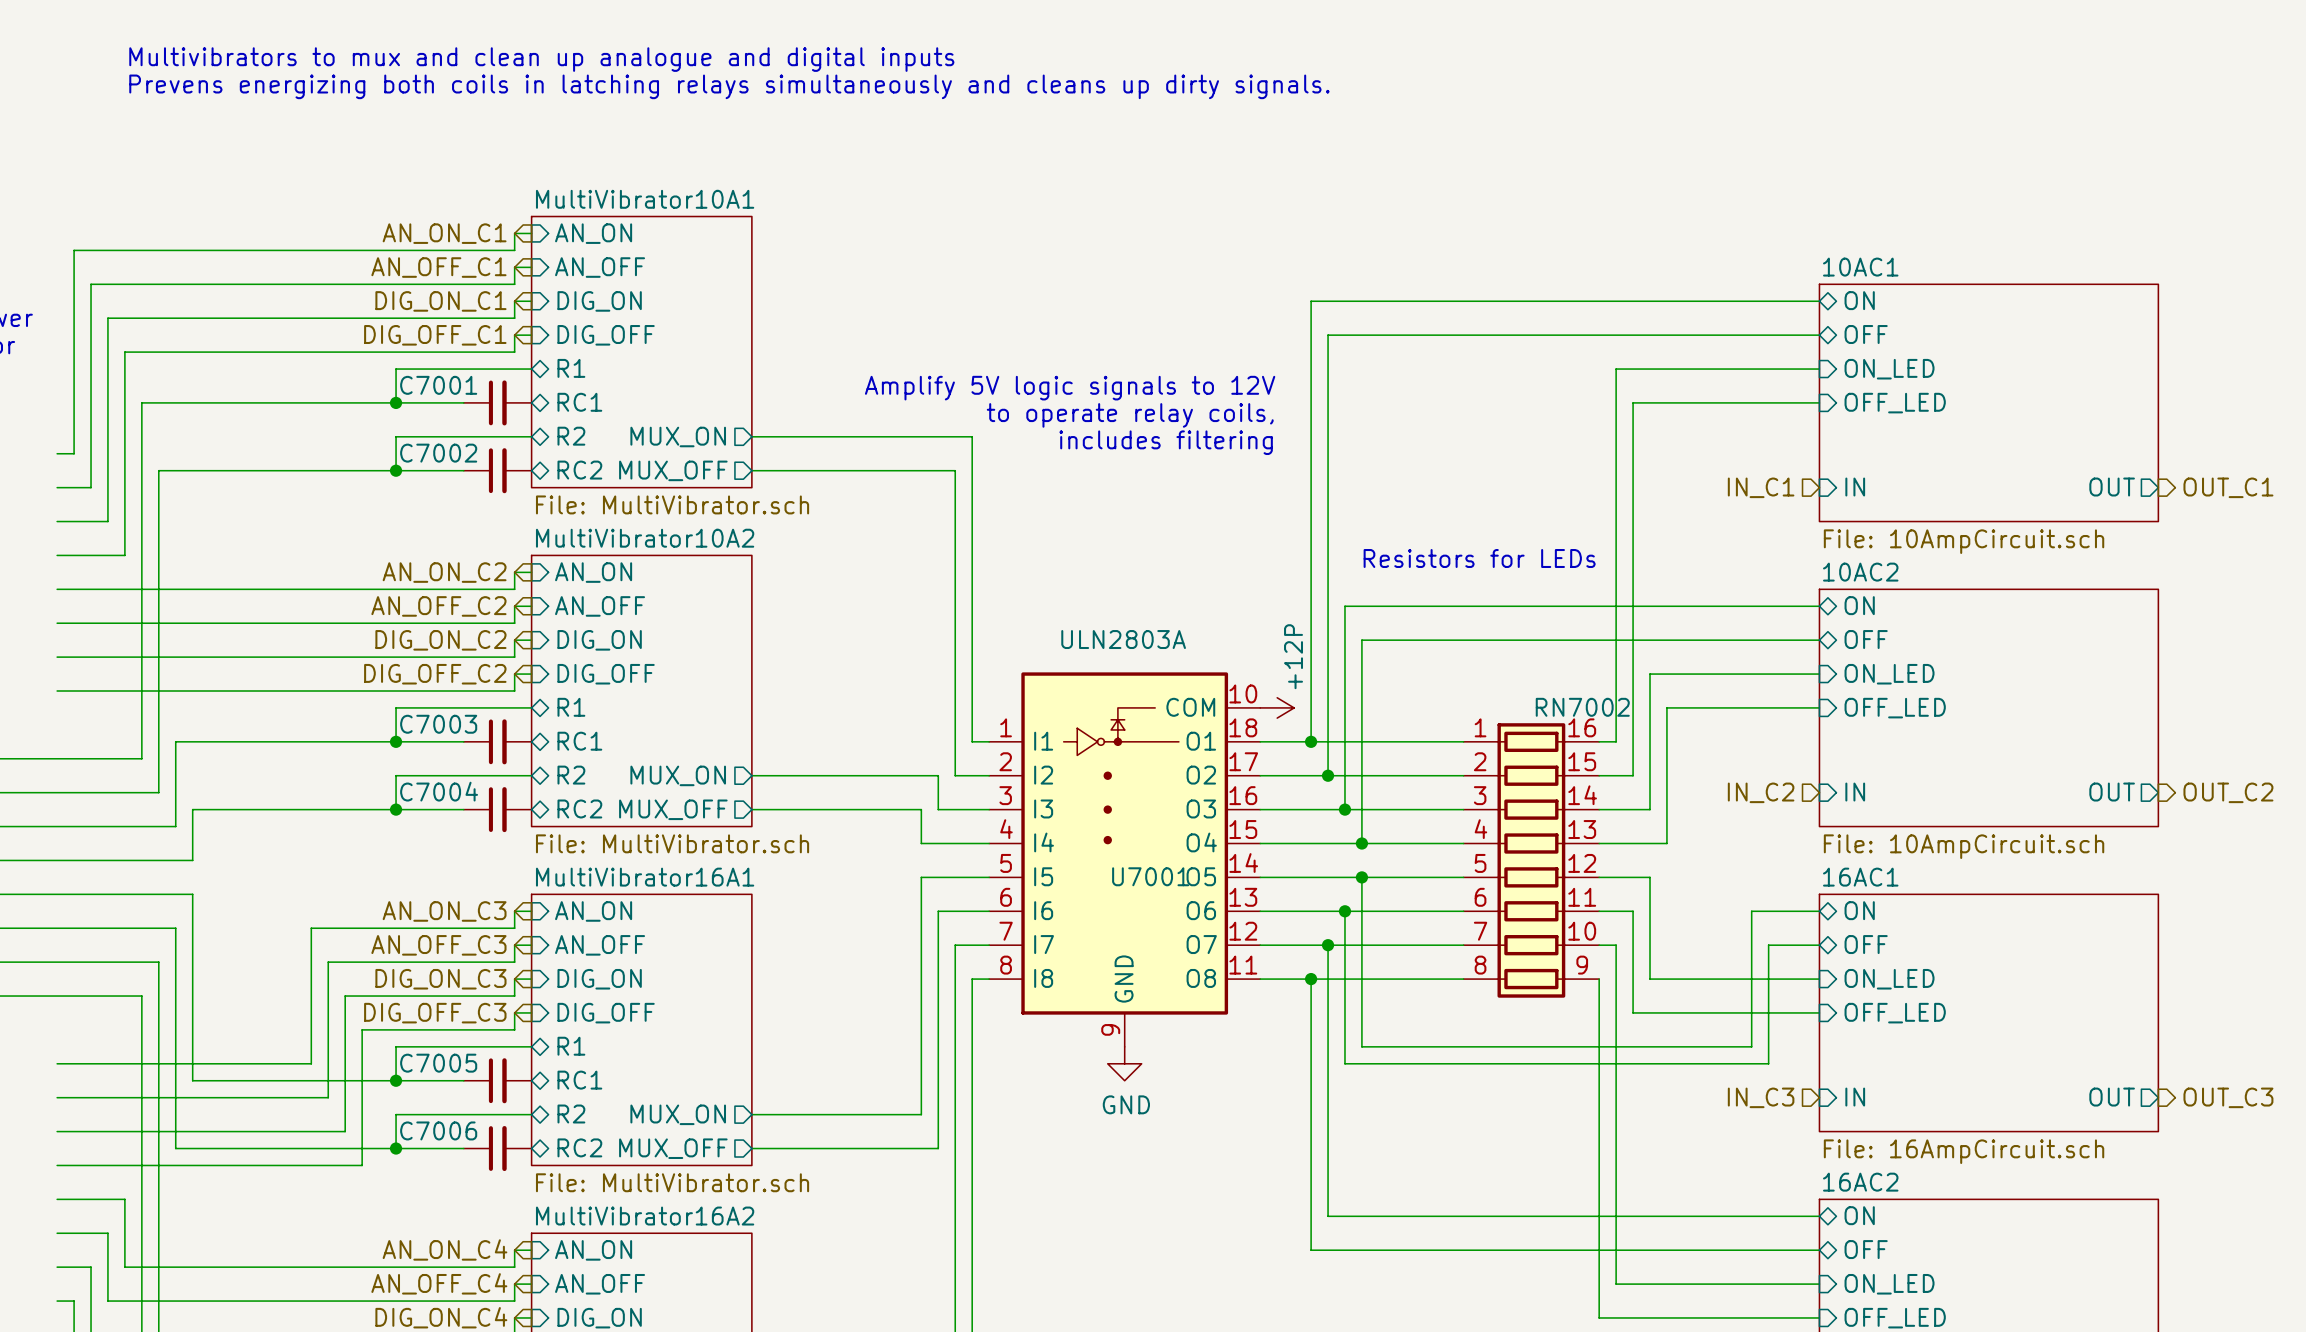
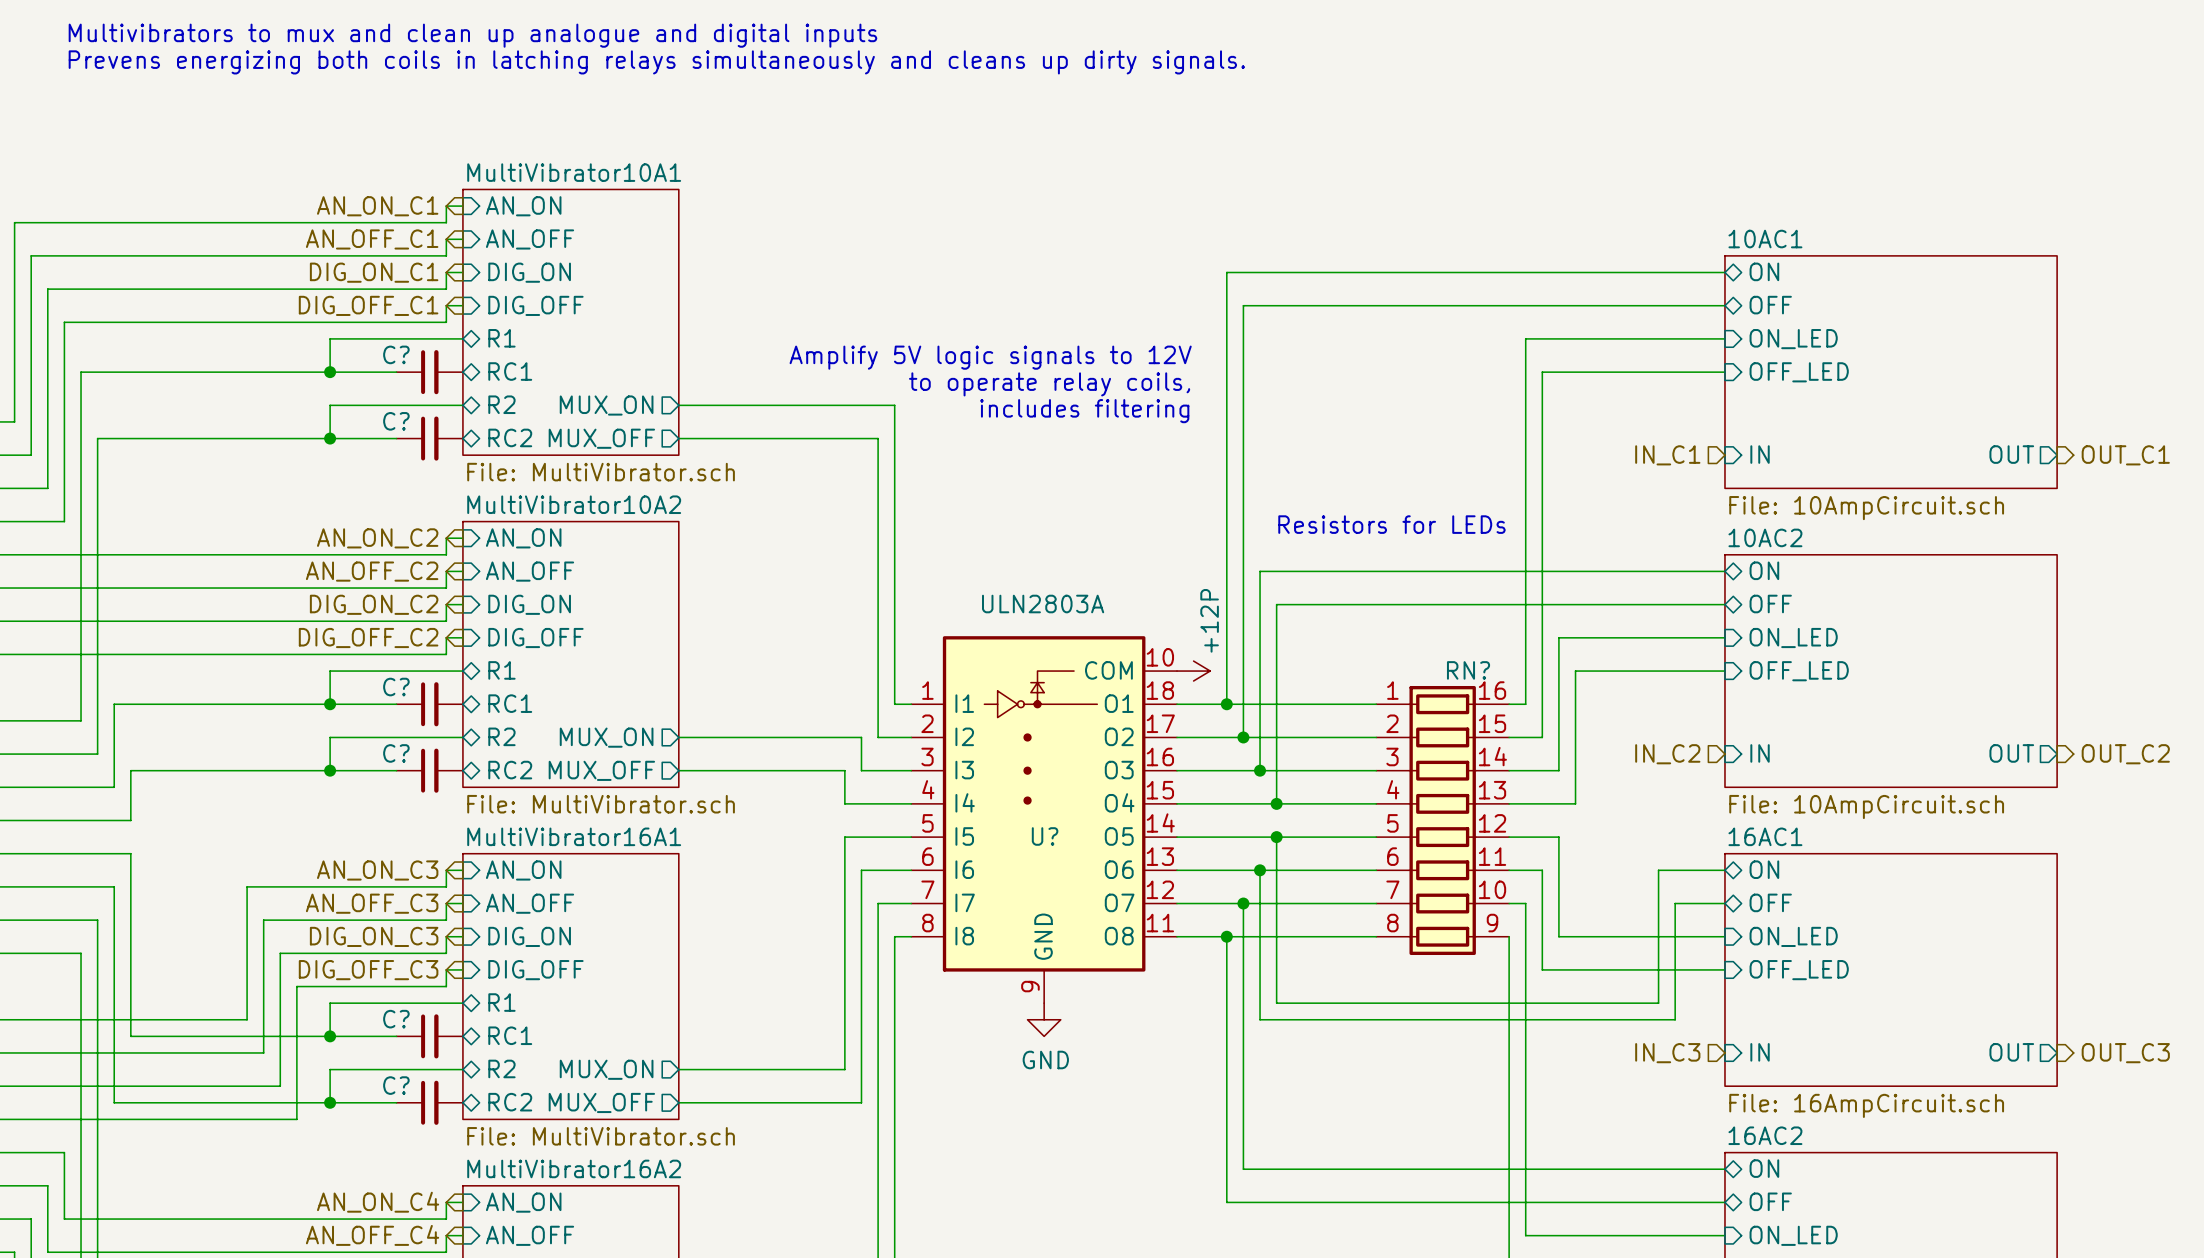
C7001 name: C7001 (438, 385) -> C? (396, 354)
C7002 name: C7002 (438, 453) -> C? (396, 421)
RN7002 name: RN7002 (1582, 707) -> RN? (1468, 670)
C7003 name: C7003 (438, 724) -> C? (396, 687)
C7004 name: C7004 (439, 791) -> C? (396, 753)
U7001 name: U7001 (1150, 876) -> U? (1045, 836)
C7005 name: C7005 (438, 1063) -> C? (396, 1019)
C7006 name: C7006 (438, 1130) -> C? (396, 1085)

